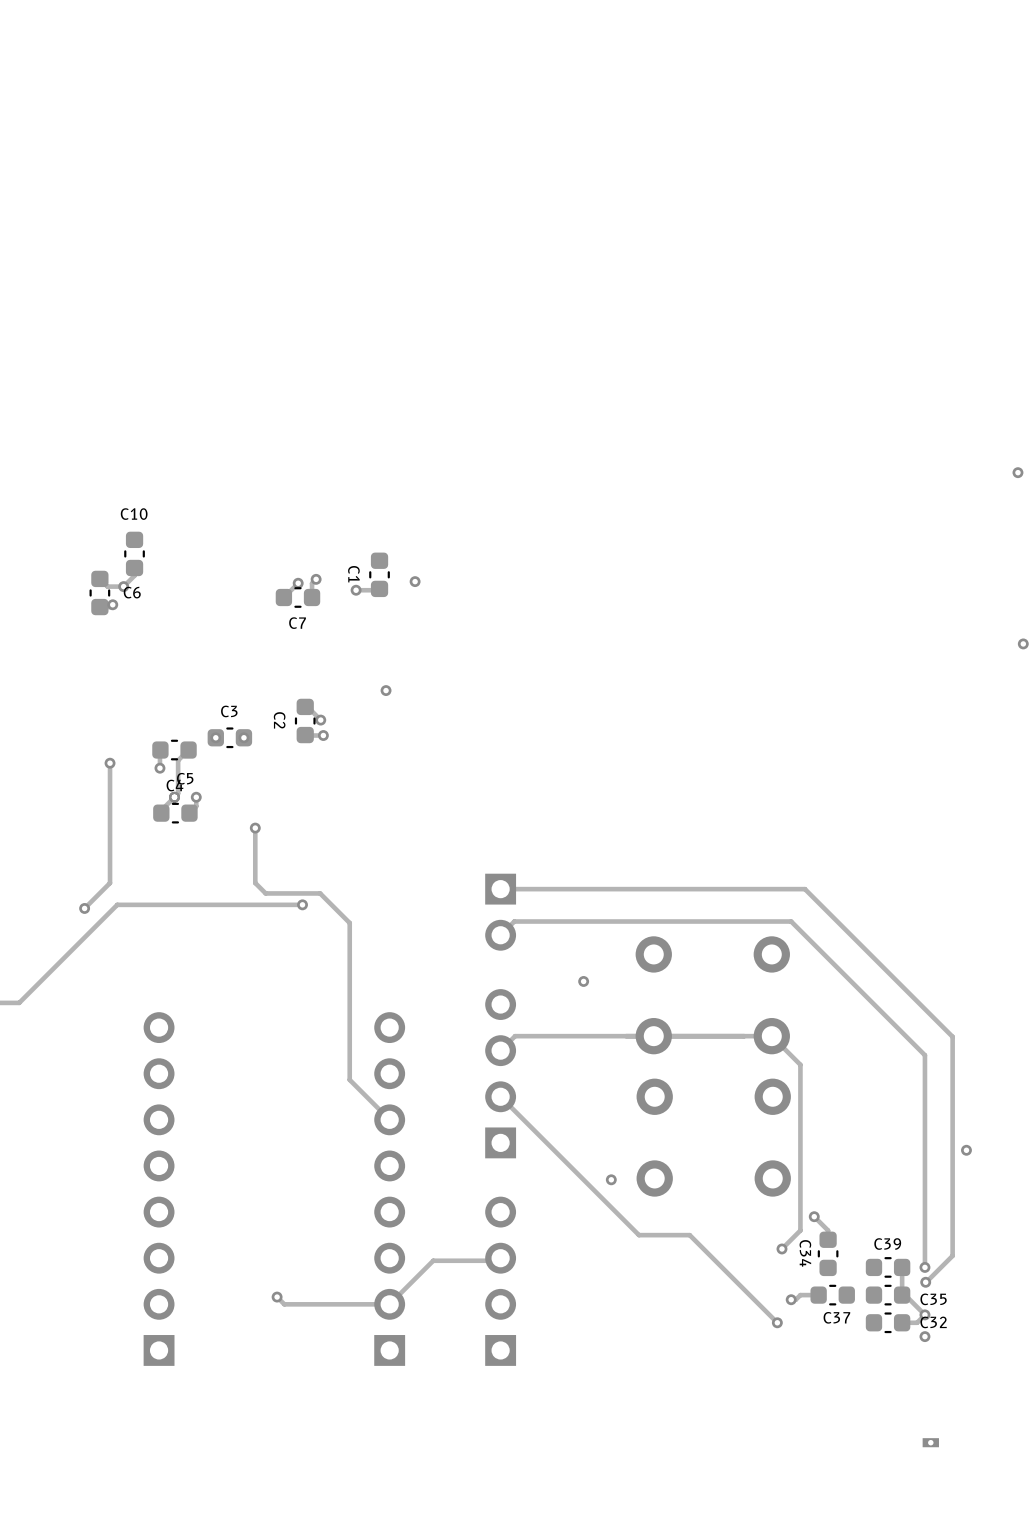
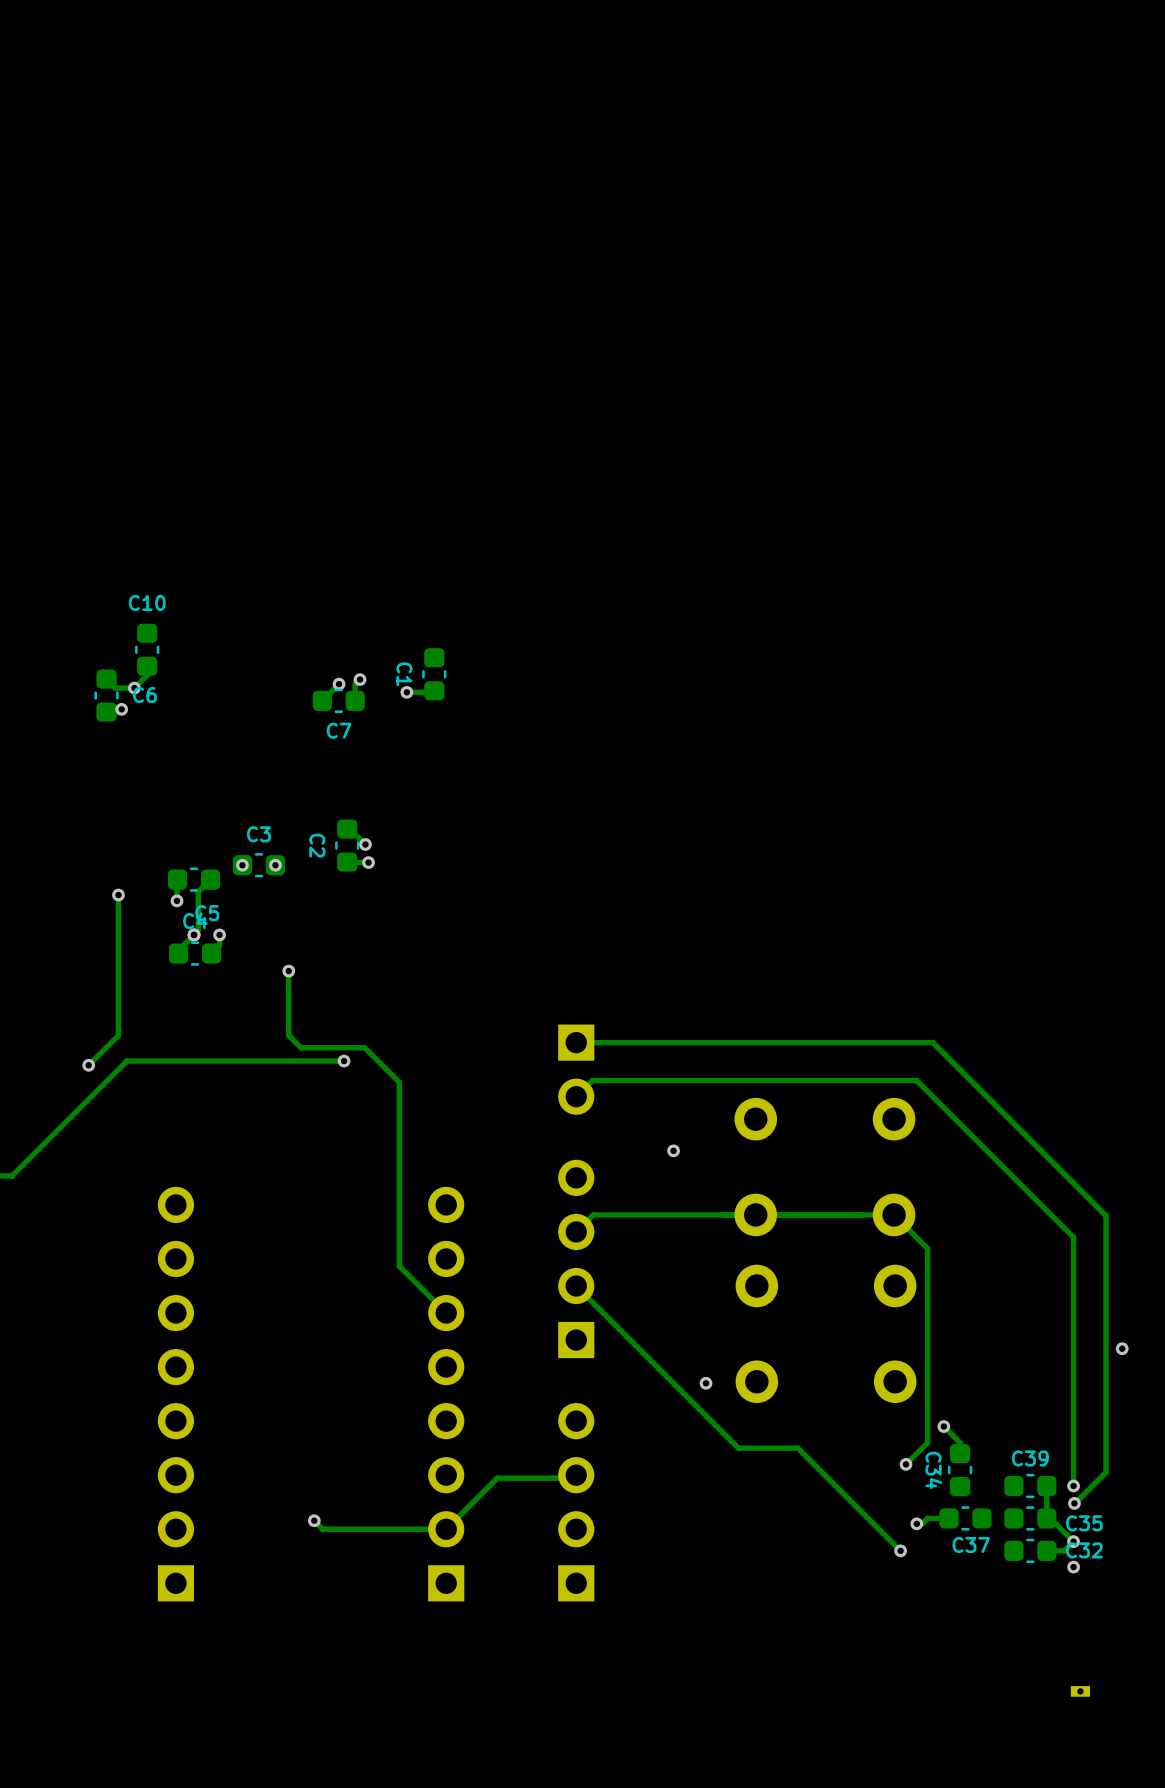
via: (415, 581) -> none
via: (386, 690) -> none

